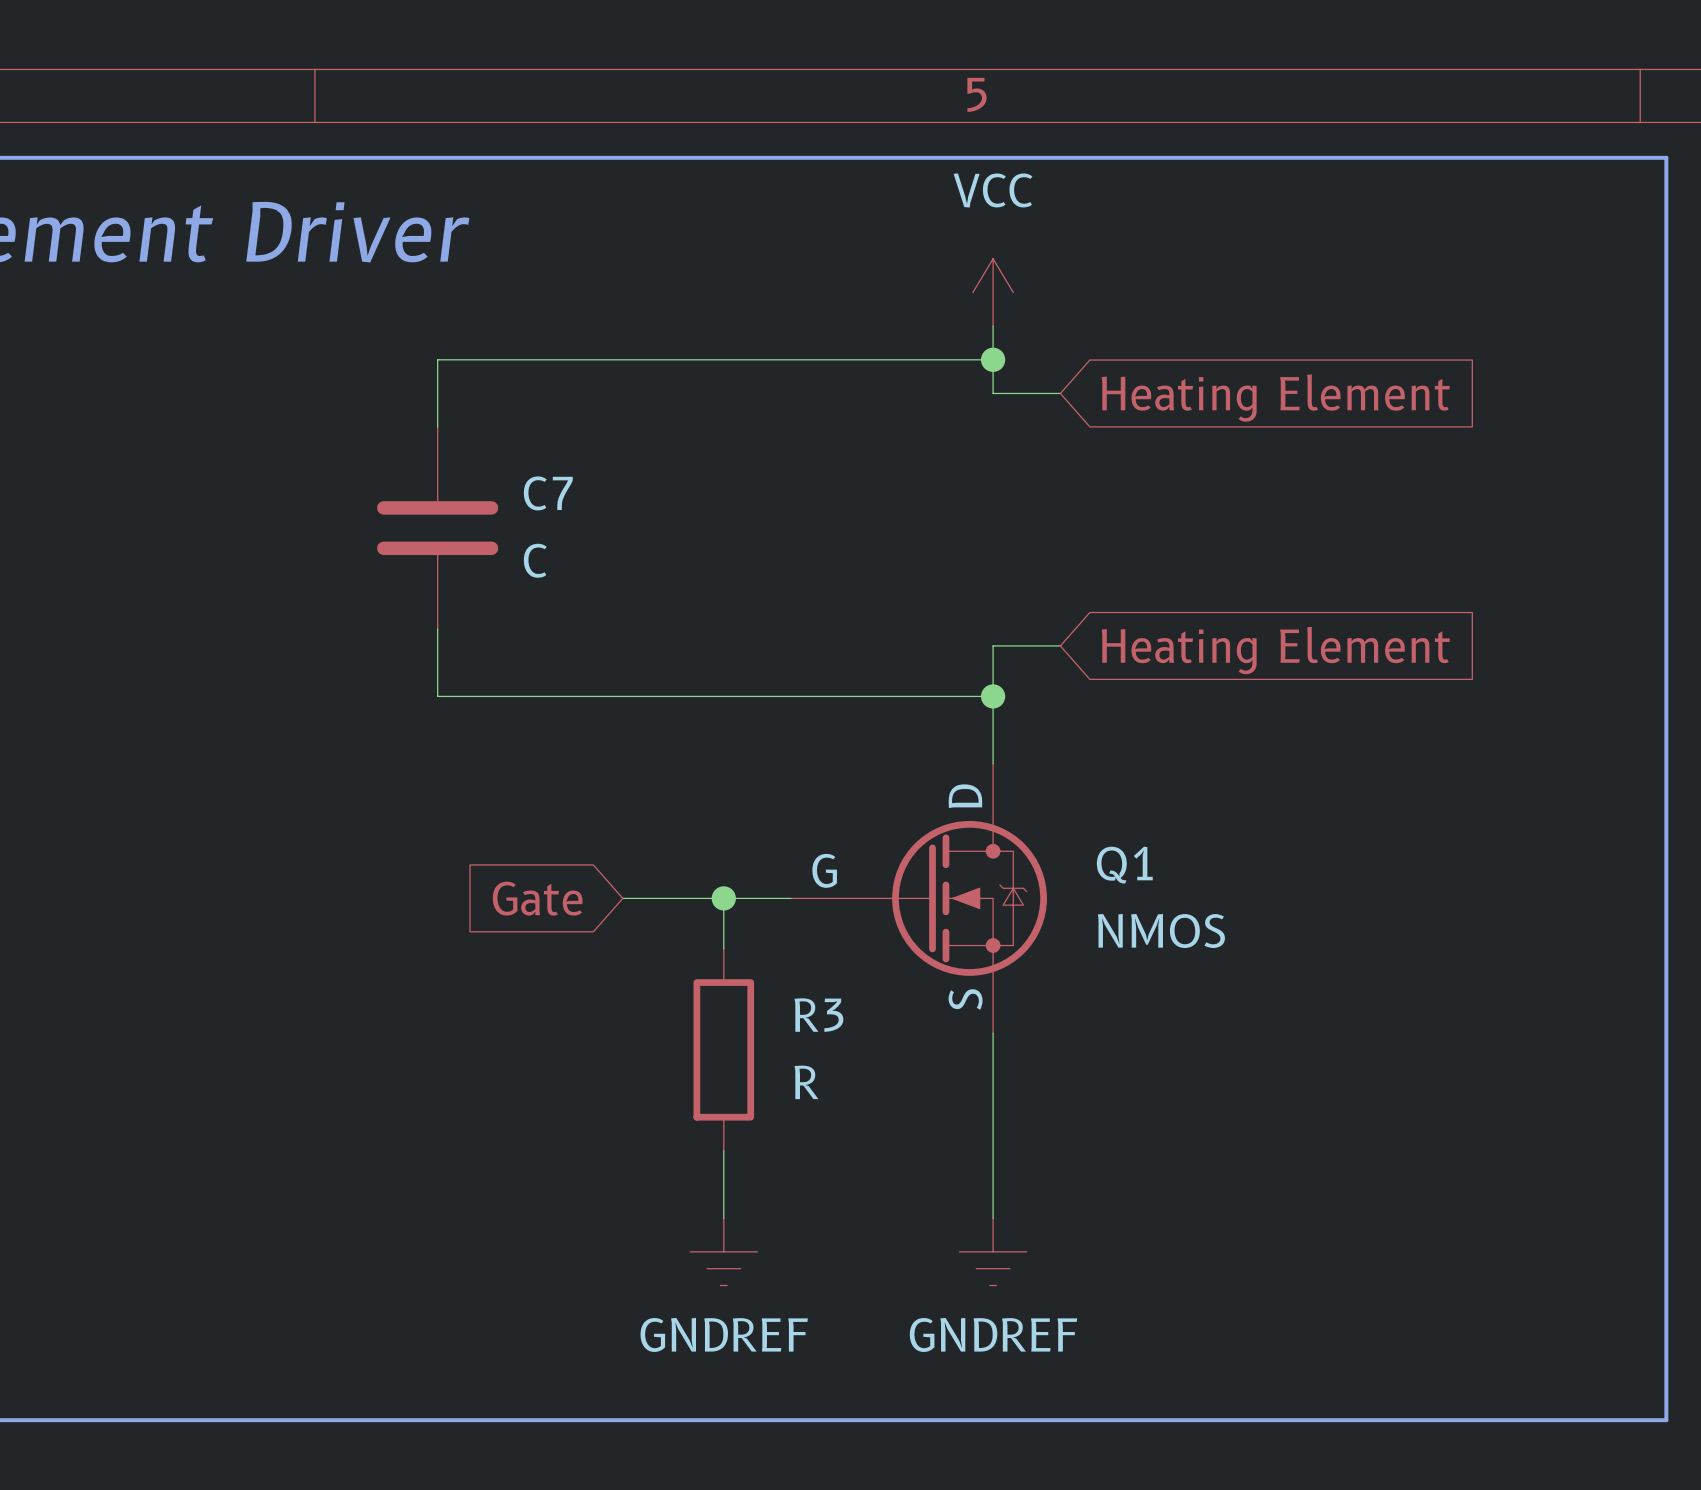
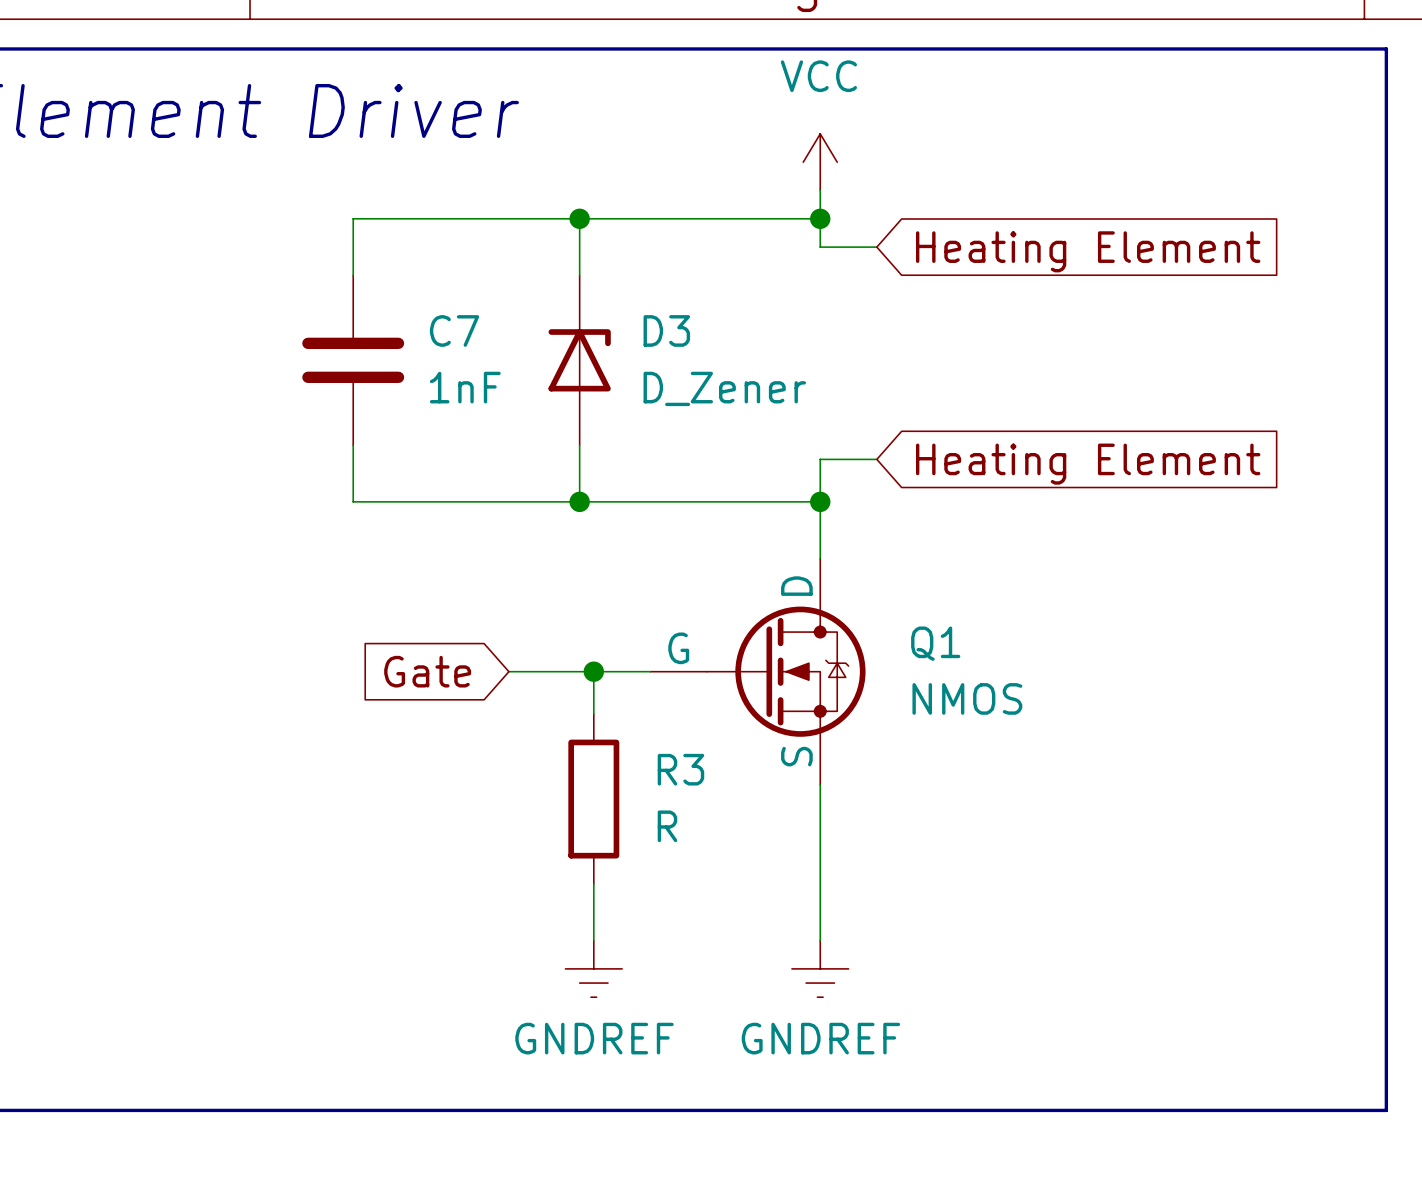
wire: none -> (579, 218) (579, 275)
junction: none -> (579, 218)
D3: none -> D_Zener (579, 360)
C7 value: C (535, 560) -> 1nF (465, 387)
wire: none -> (579, 445) (579, 501)
junction: none -> (579, 501)

